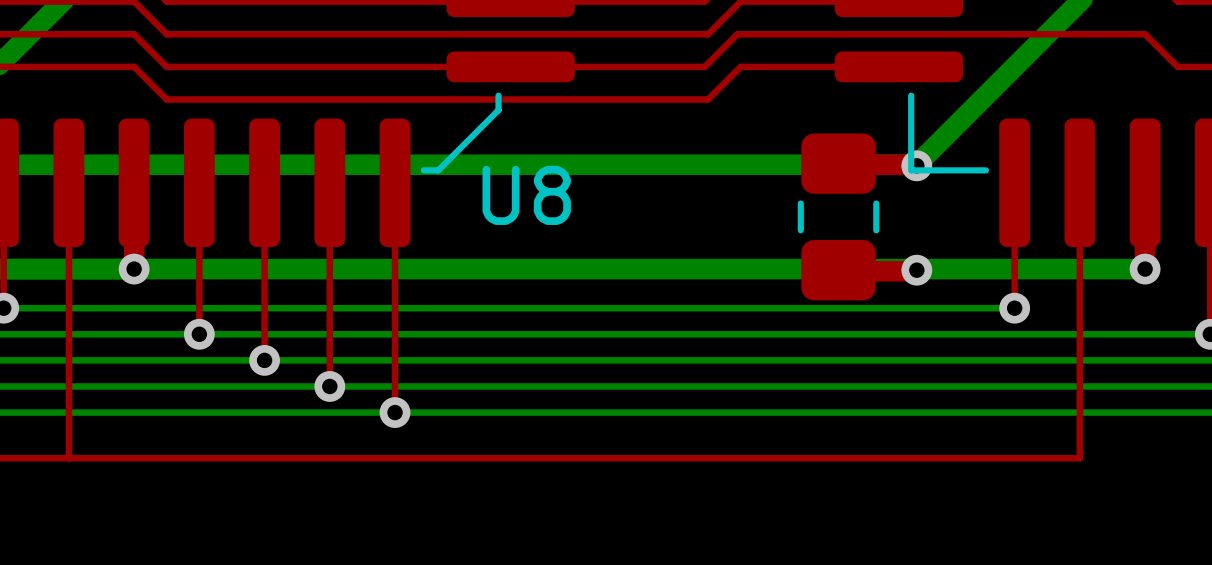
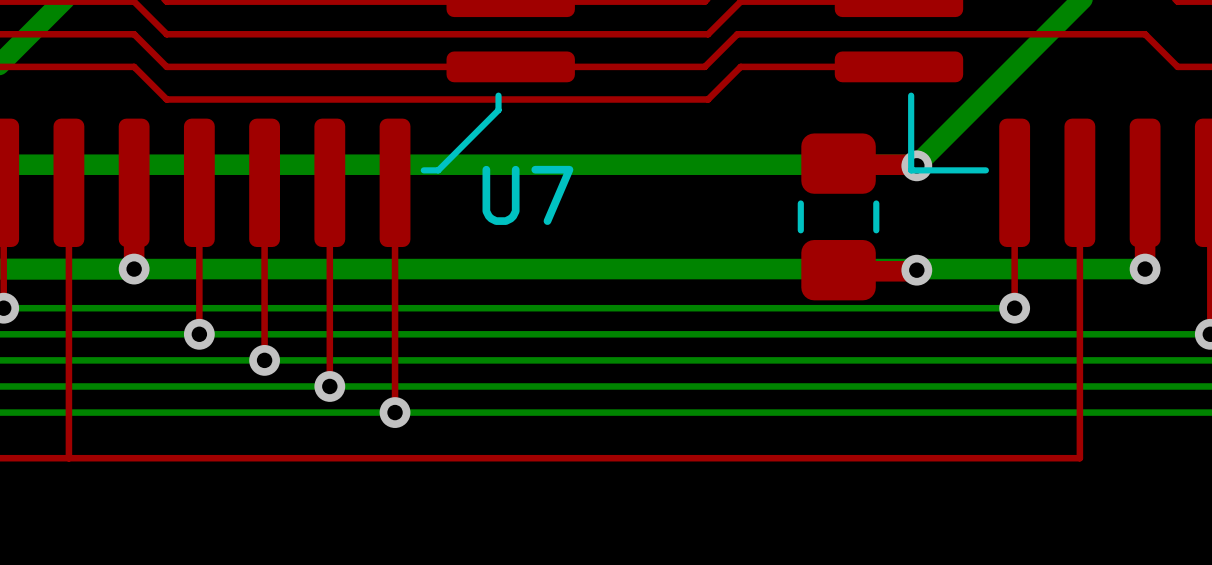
U8 name: U8 (526, 195) -> U7 (527, 195)

